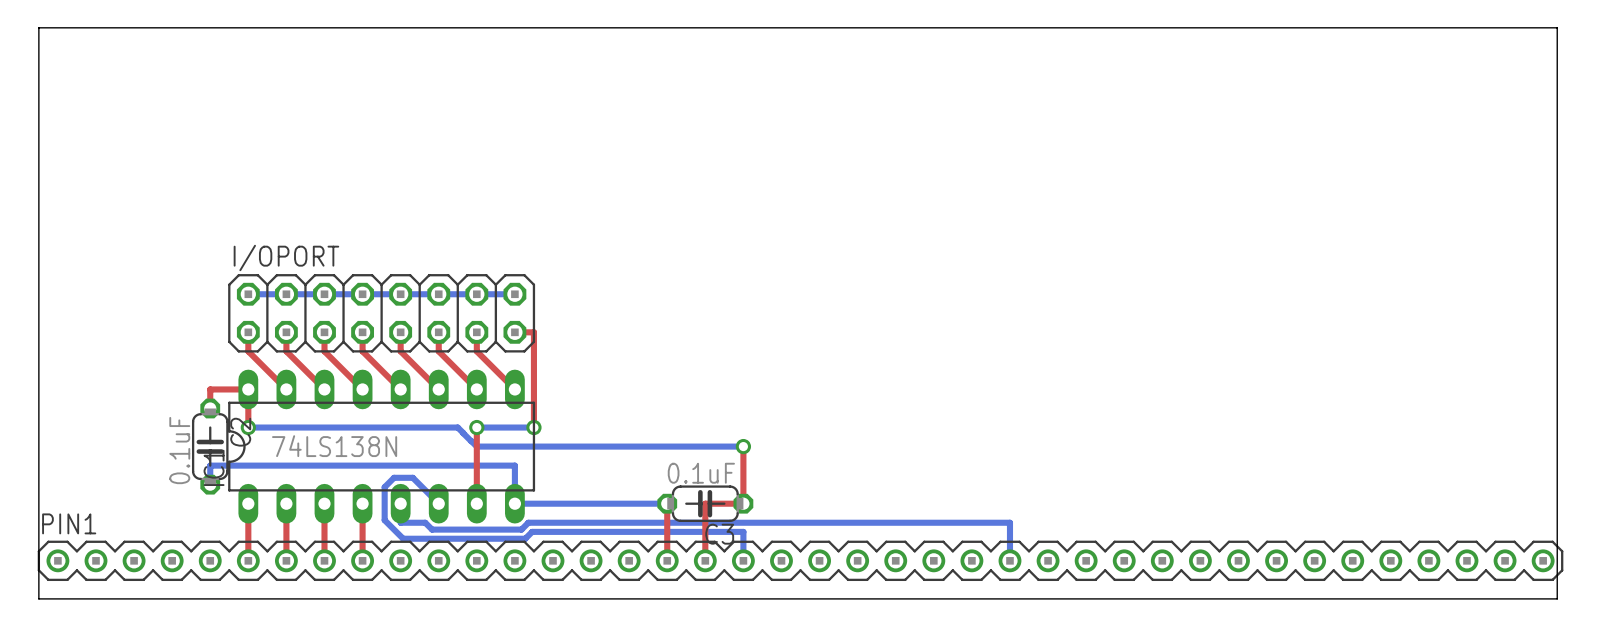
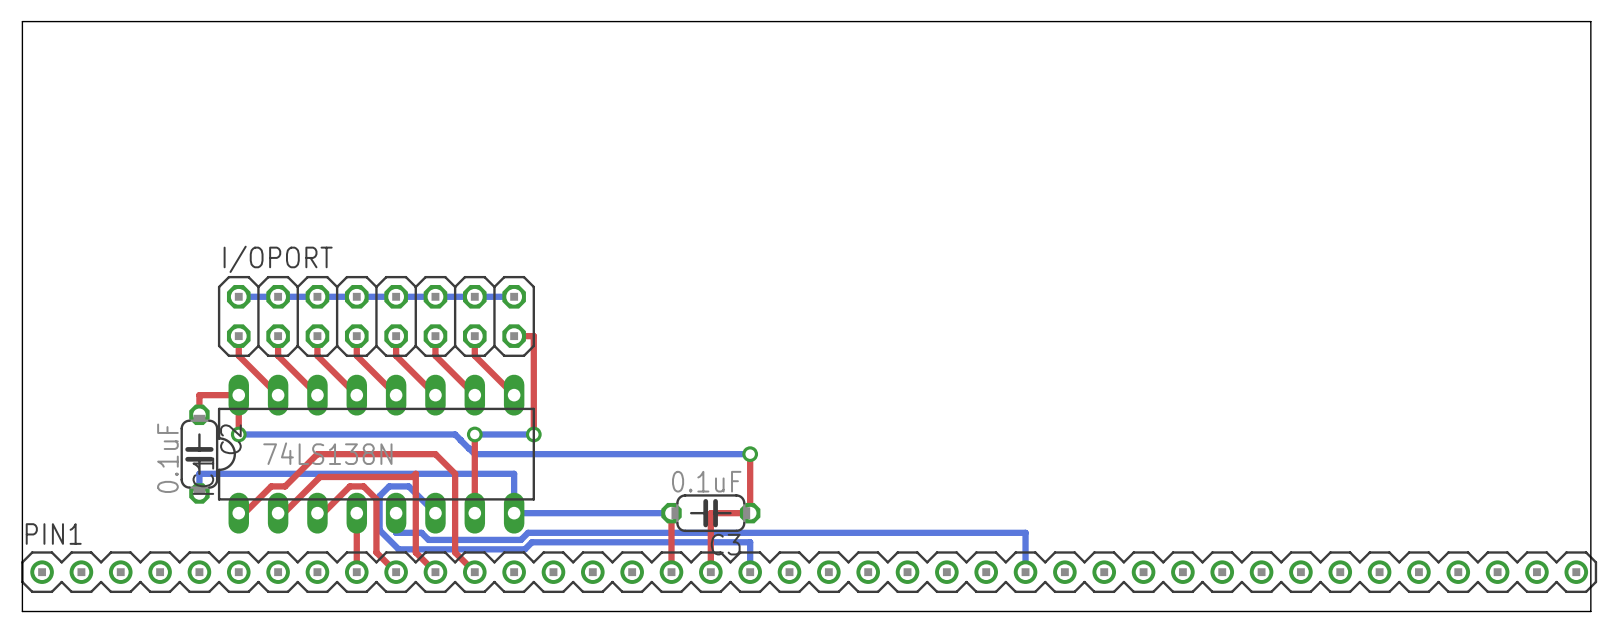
top track: (248, 503) (248, 560) -> (238, 513) (244, 513) (271, 486) (285, 486) (317, 454) (435, 454) (455, 473) (455, 552) (474, 572)
top track: (286, 503) (286, 560) -> (278, 513) (283, 513) (320, 476) (412, 476) (415, 473) (415, 552) (435, 572)
top track: (324, 503) (324, 560) -> (317, 513) (323, 513) (349, 486) (363, 486) (376, 499) (376, 552) (396, 572)

